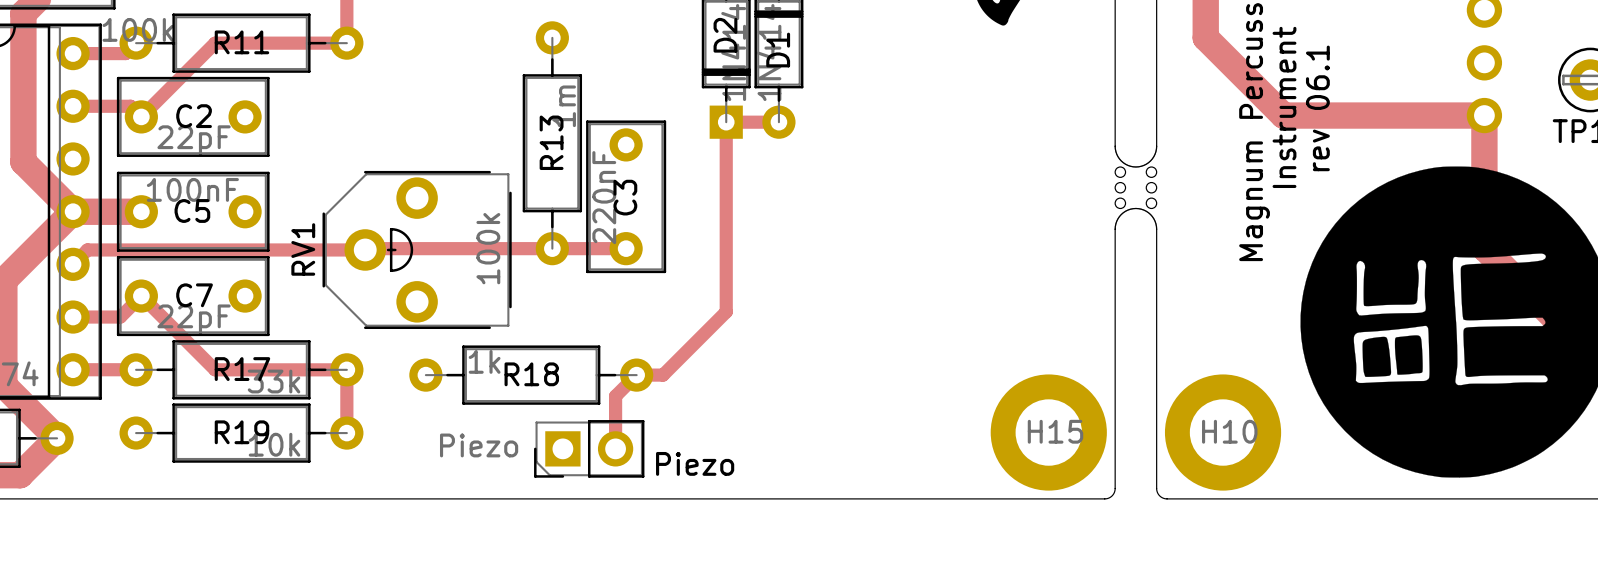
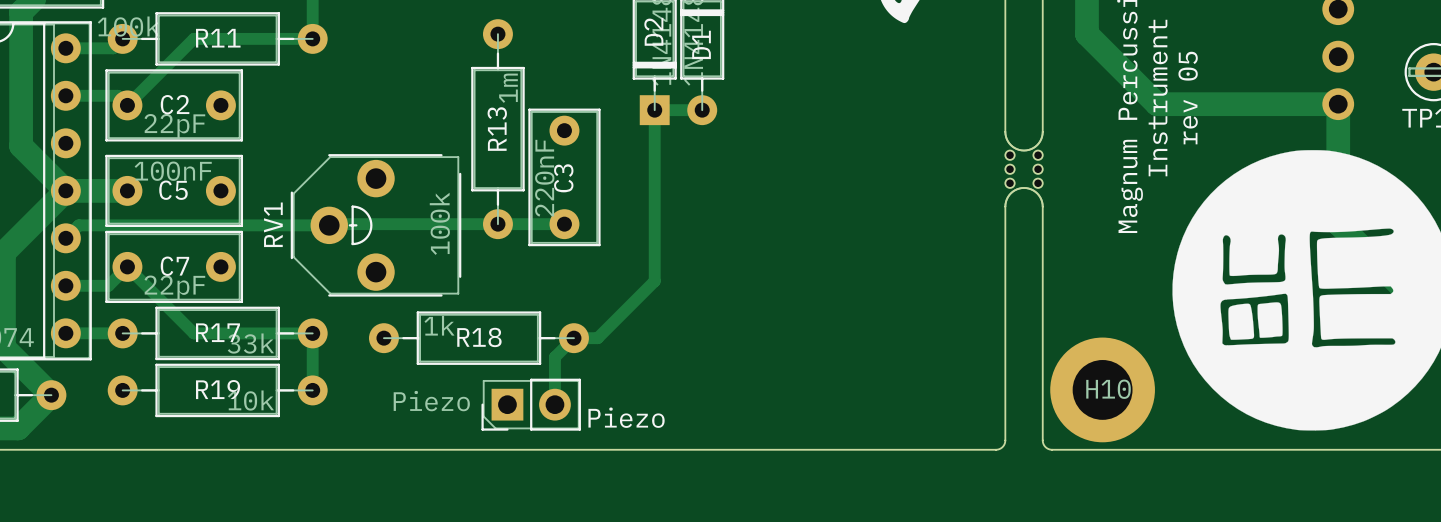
text: rev 06.1 (1317, 108) -> rev 05 (1188, 98)
H15: (1048, 432) -> none

